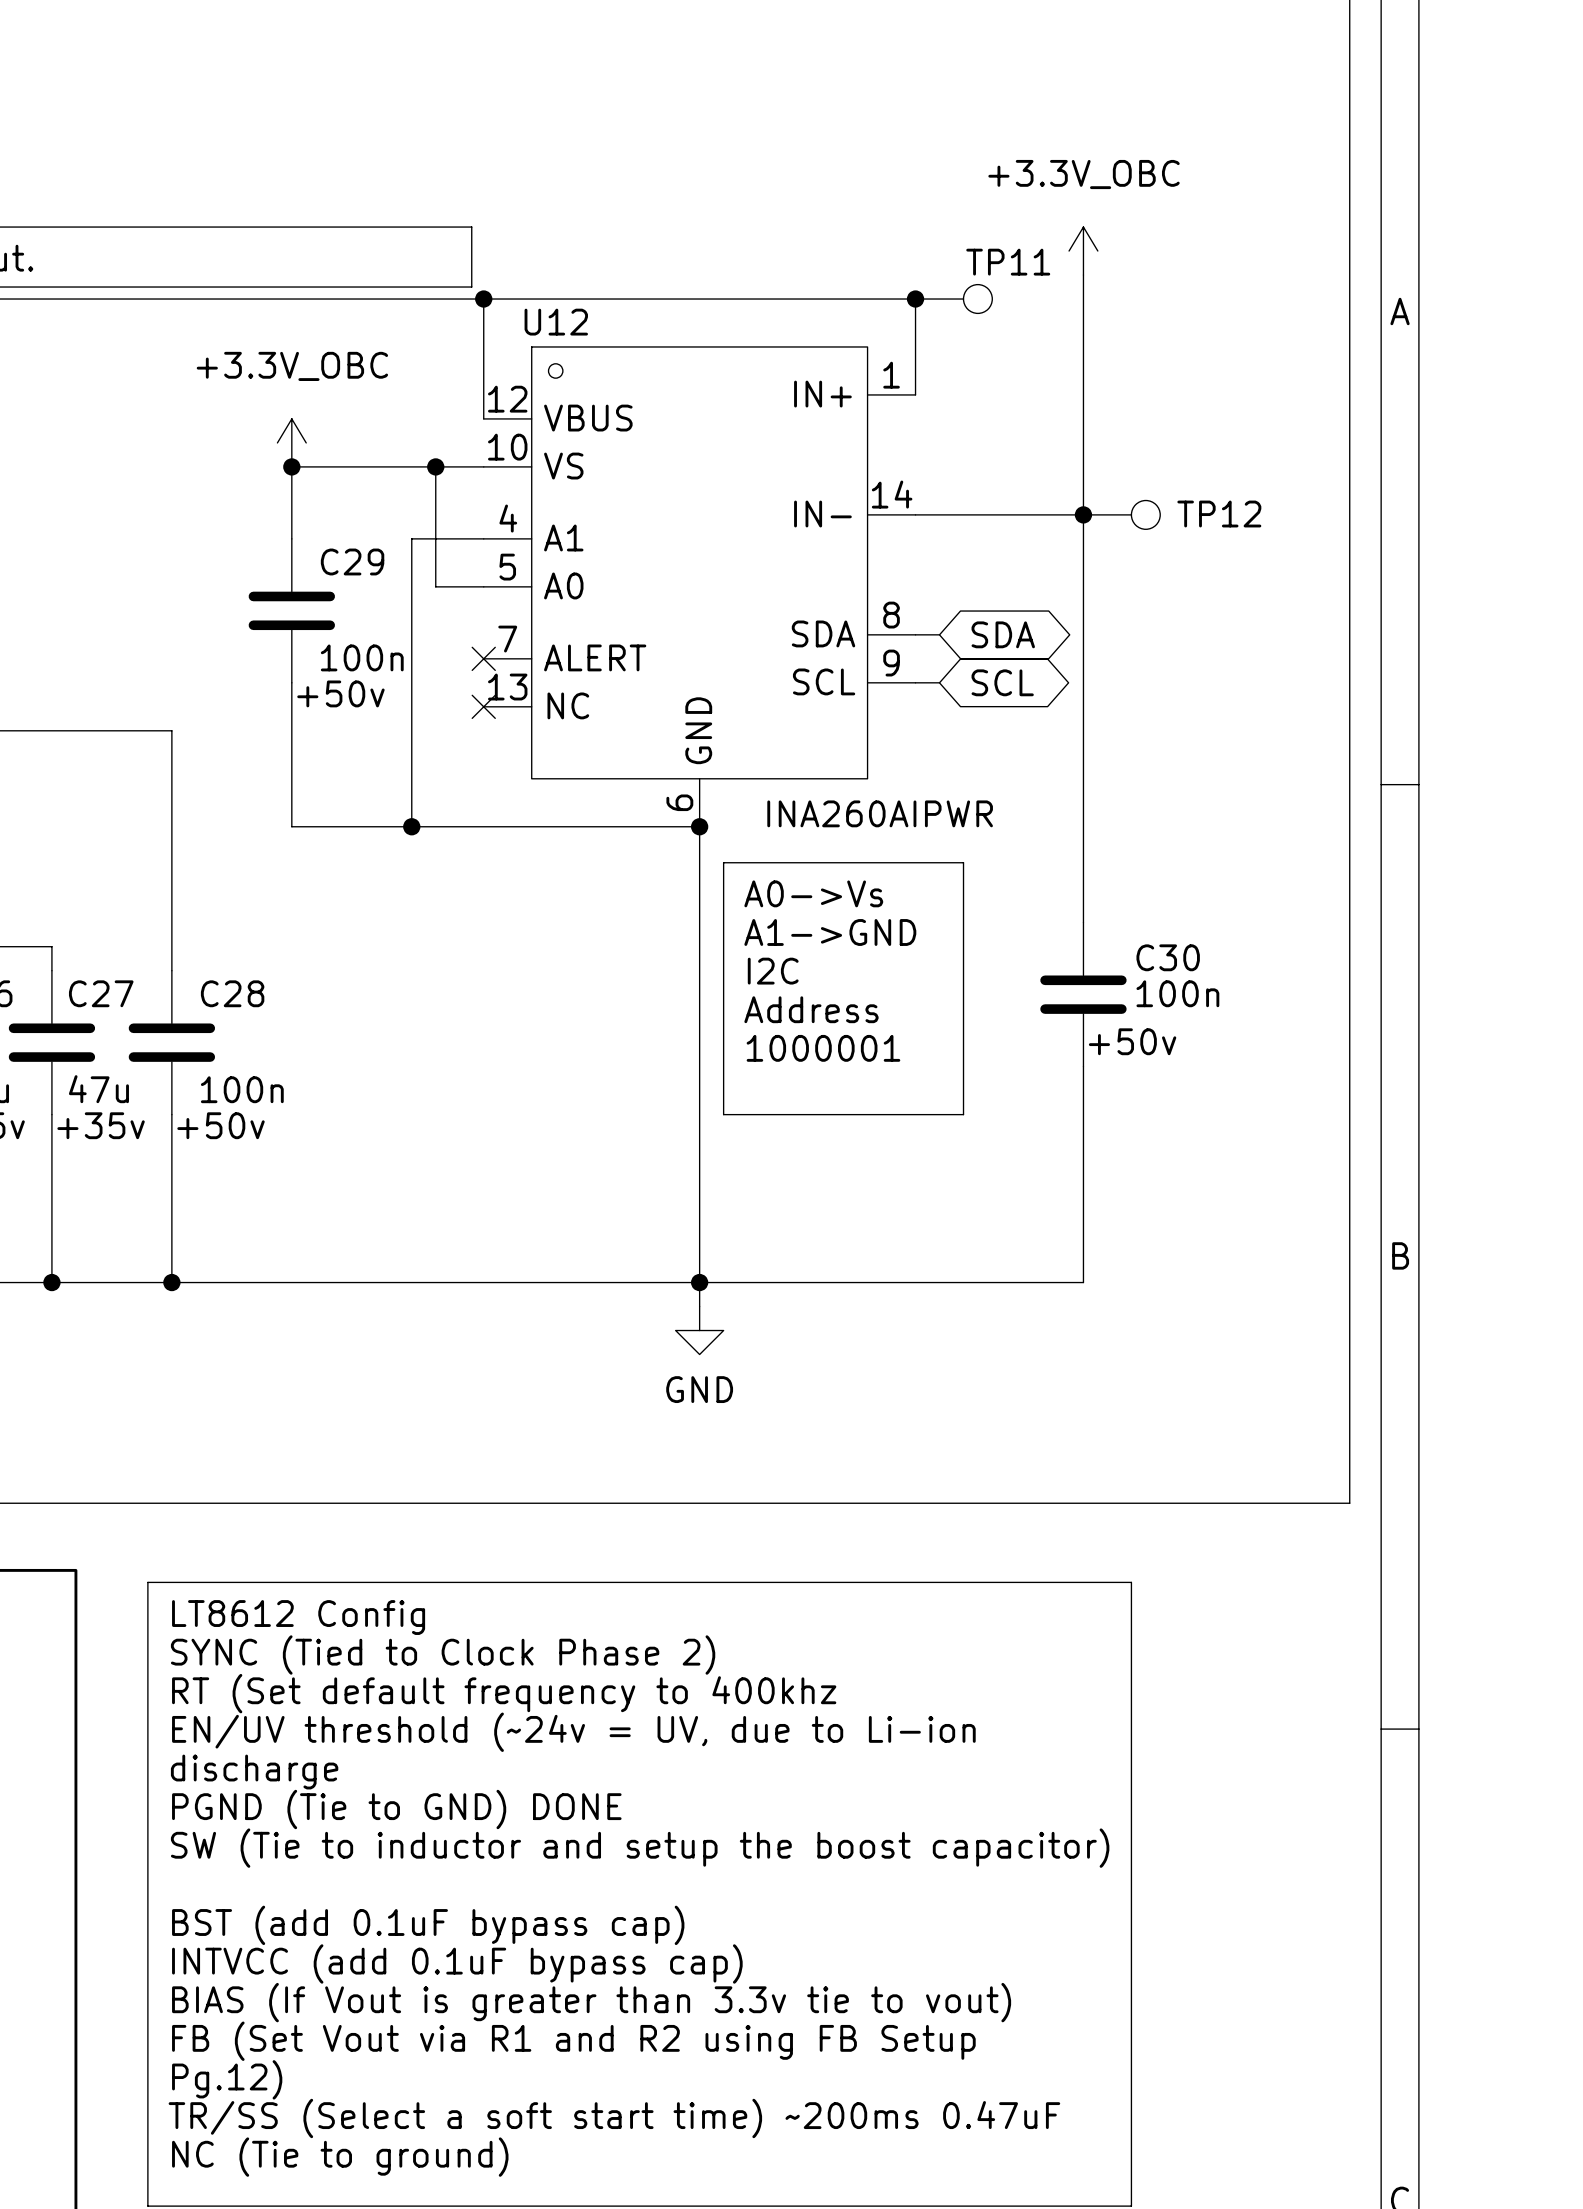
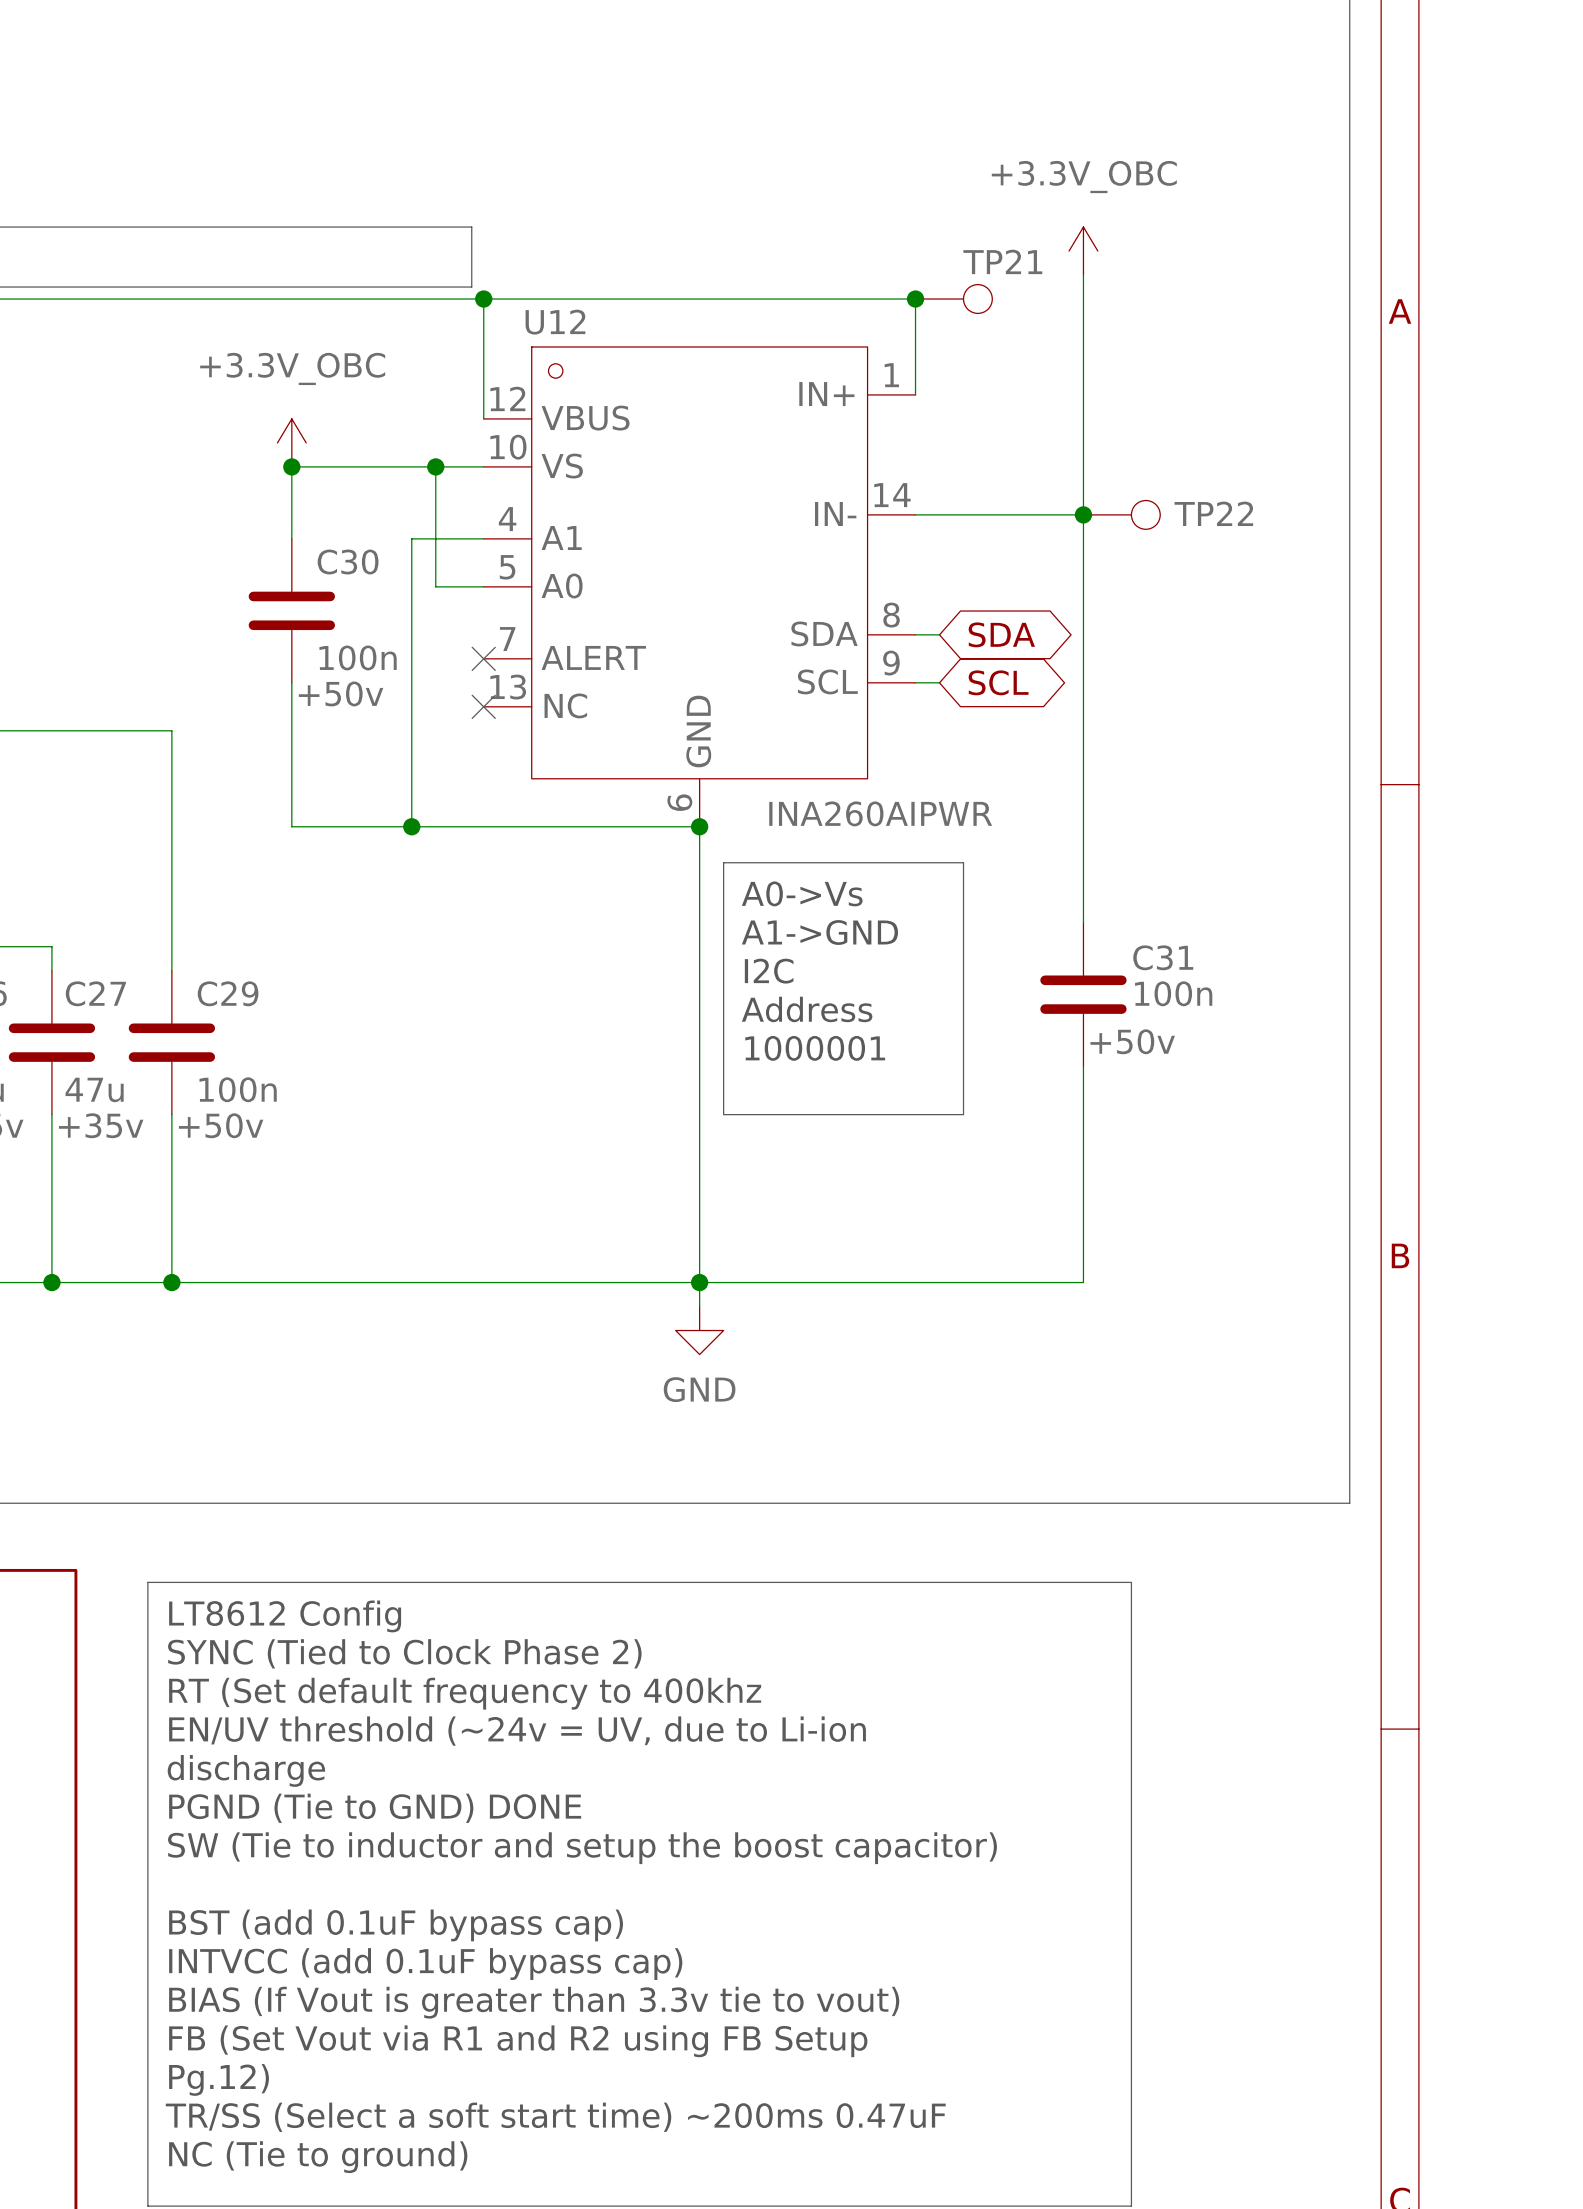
TP11 name: TP11 (1008, 262) -> TP21 (1002, 261)
TP12 name: TP12 (1219, 514) -> TP22 (1213, 513)
C29 name: C29 (352, 561) -> C30 (348, 562)
C30 name: C30 (1168, 957) -> C31 (1163, 957)
C28 name: C28 (232, 993) -> C29 (228, 993)

